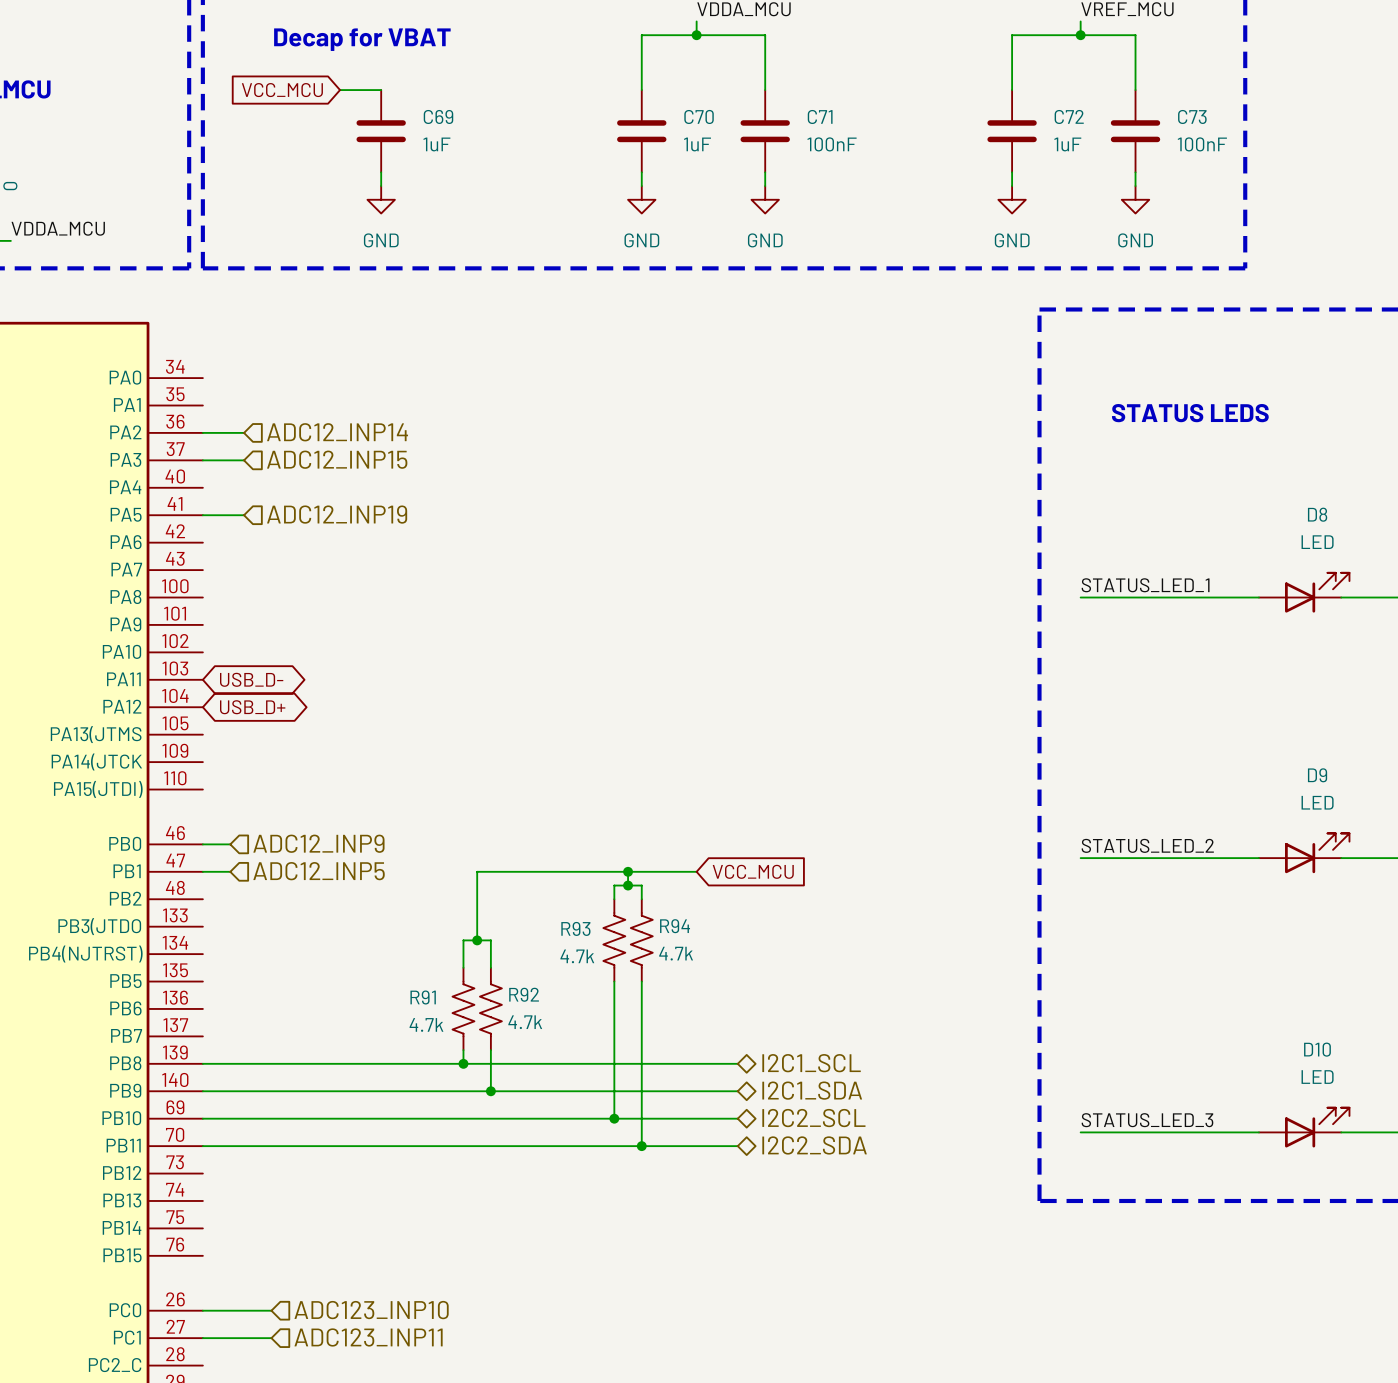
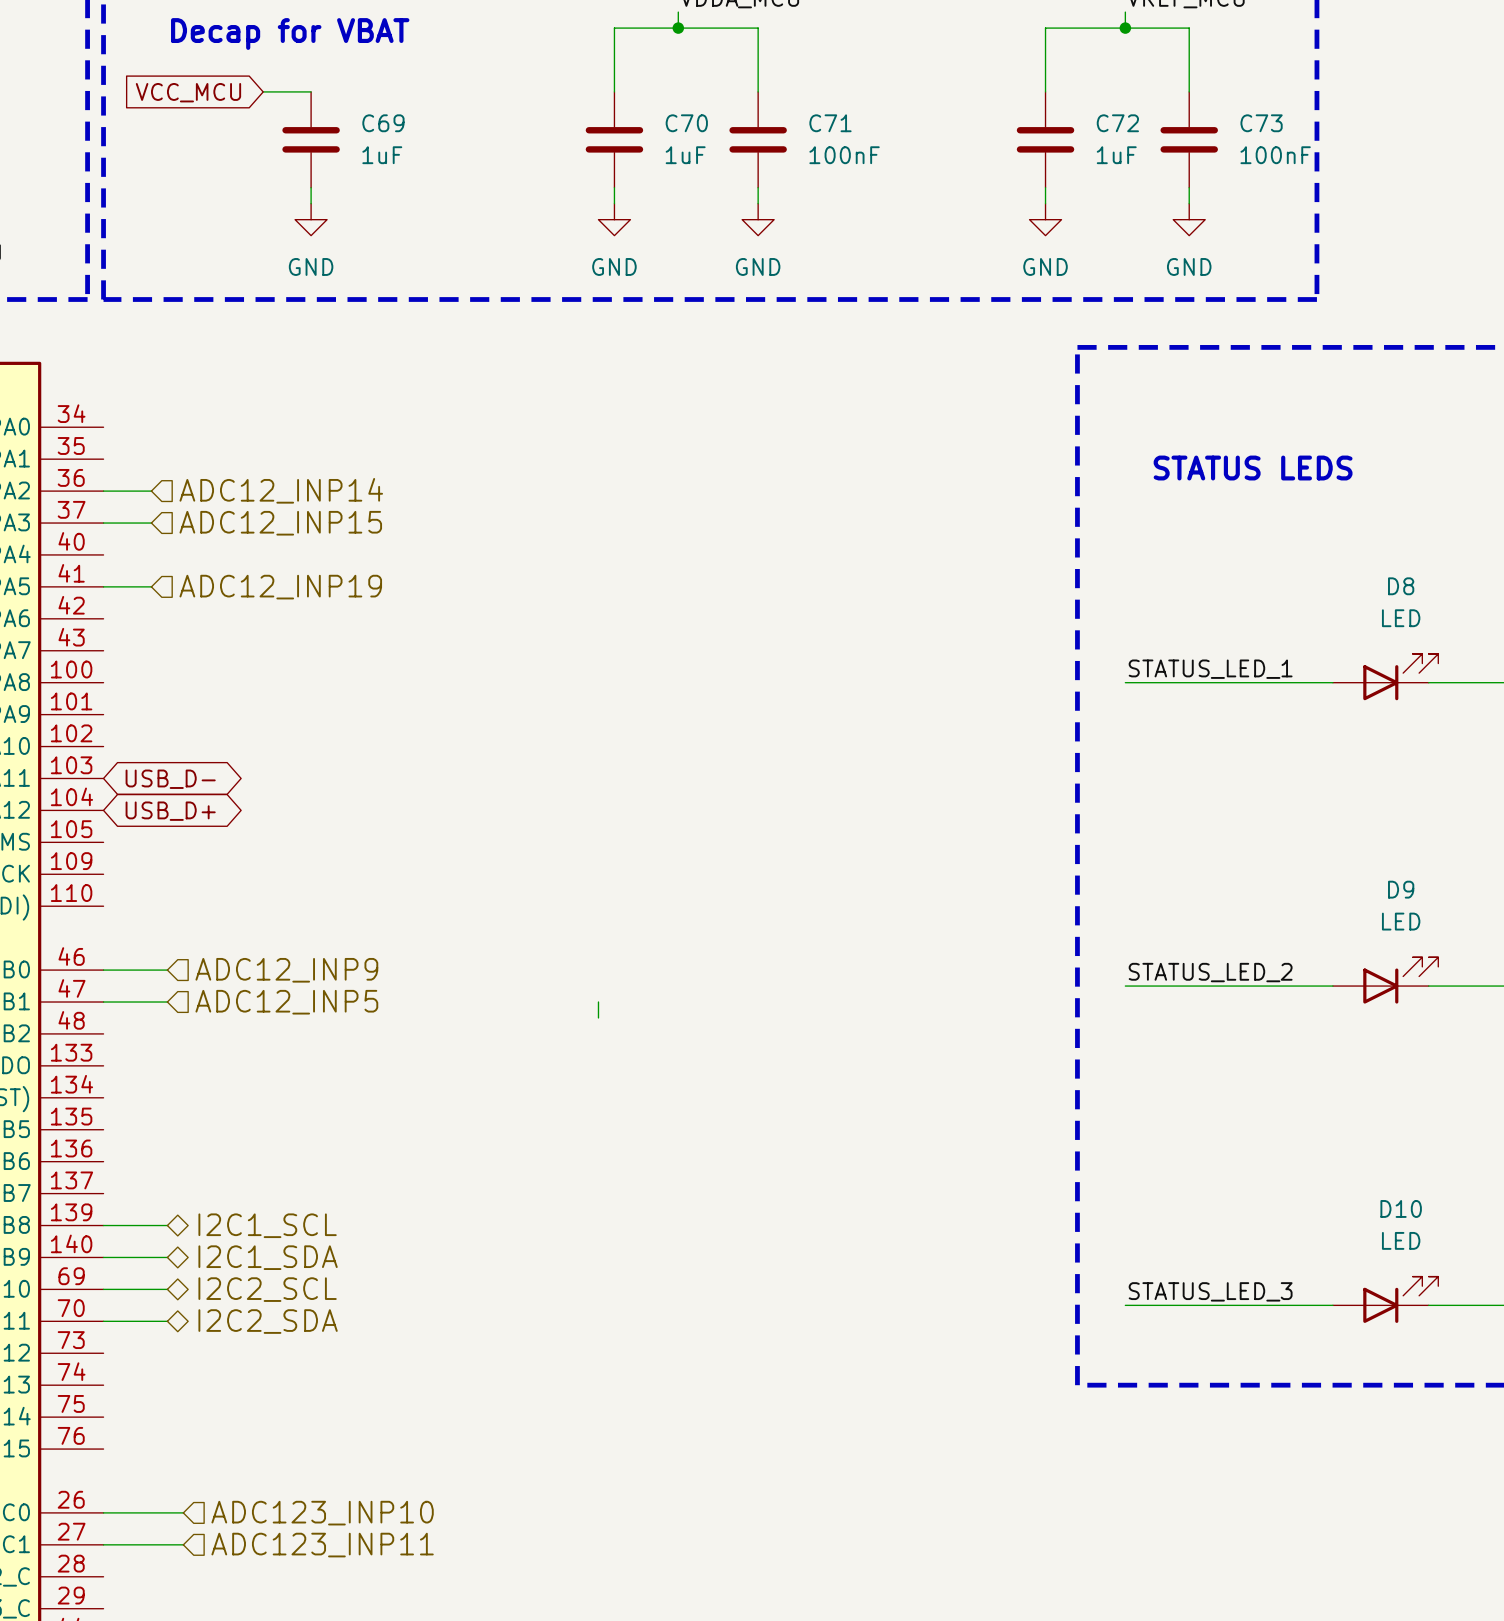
hierarchical label position: ADC12_INP9 (318, 843) -> ADC12_INP9 (286, 970)
wire: none -> (135, 970) (167, 970)
wire: none -> (135, 1002) (167, 1002)
hierarchical label position: ADC12_INP5 (319, 871) -> ADC12_INP5 (286, 1002)
junction: (628, 871) -> none
wire: (696, 871) (477, 871) (477, 940) -> none
global label: VCC_MCU (753, 871) -> none
junction: (628, 885) -> none
wire: (614, 899) (614, 885) (641, 885) (641, 899) -> none
junction: (477, 940) -> none
R93: 4.7k (614, 940) -> none
R94: 4.7k (641, 940) -> none
wire: (463, 967) (463, 940) (490, 940) (490, 967) -> none
wire: (614, 981) (614, 1118) -> none
wire: (641, 981) (641, 1146) -> none
R91: 4.7k (463, 1008) -> none
R92: 4.7k (490, 1008) -> none
wire: (463, 1050) (463, 1063) -> none
wire: (490, 1050) (490, 1091) -> none
wire: (257, 1063) (737, 1063) -> none
hierarchical label: none -> I2C1_SCL (267, 1225)
junction: (463, 1063) -> none
hierarchical label: I2C1_SCL (811, 1063) -> none
hierarchical label: none -> I2C1_SDA (268, 1257)
hierarchical label: I2C1_SDA (812, 1090) -> none
wire: (257, 1091) (737, 1091) -> none
junction: (490, 1091) -> none
wire: (257, 1118) (737, 1118) -> none
hierarchical label: none -> I2C2_SCL (267, 1289)
junction: (614, 1118) -> none
hierarchical label: I2C2_SCL (813, 1118) -> none
hierarchical label: none -> I2C2_SDA (268, 1321)
hierarchical label: I2C2_SDA (814, 1145) -> none
wire: (257, 1146) (737, 1146) -> none
junction: (641, 1146) -> none

